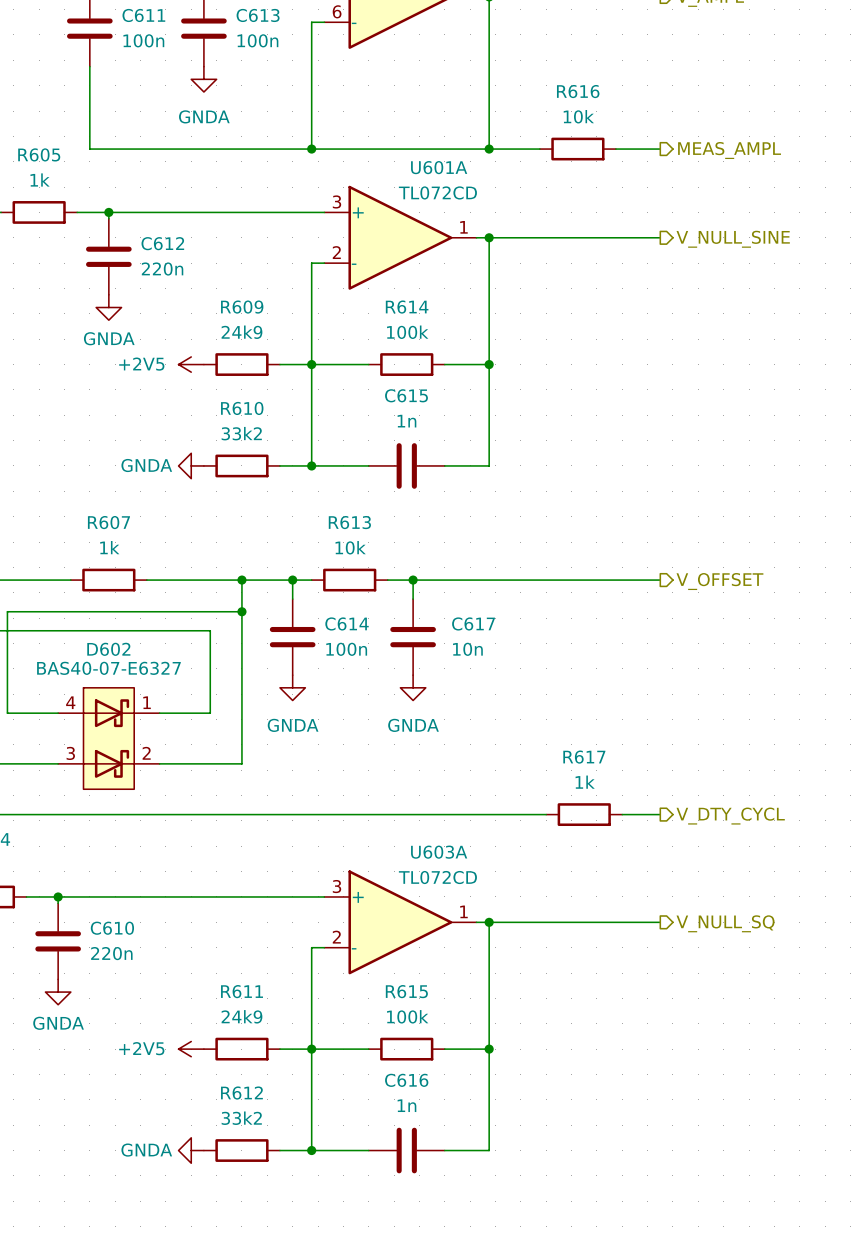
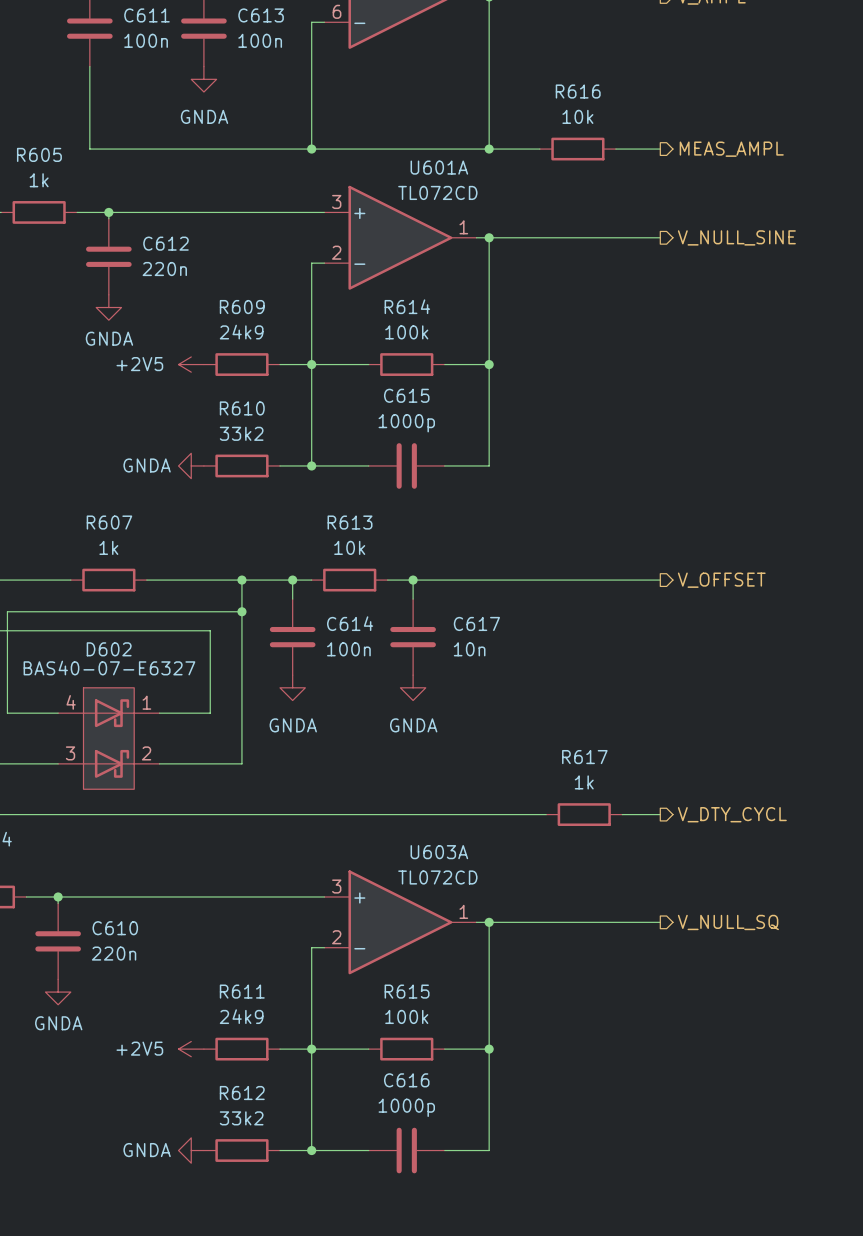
C615 value: 1n (406, 421) -> 1000p (406, 423)
C616 value: 1n (406, 1105) -> 1000p (406, 1107)

